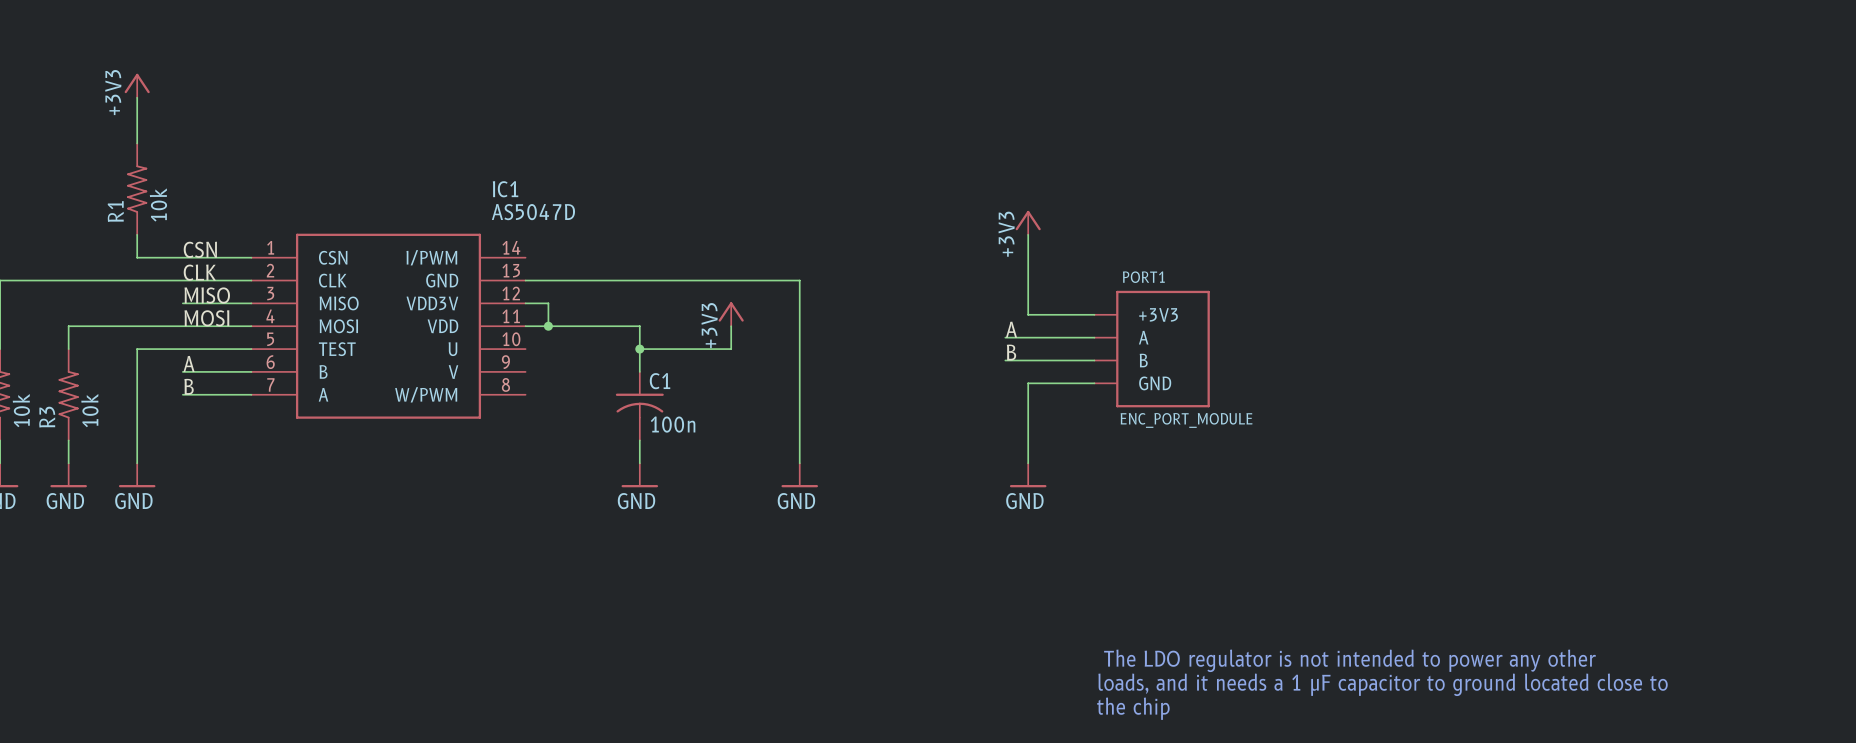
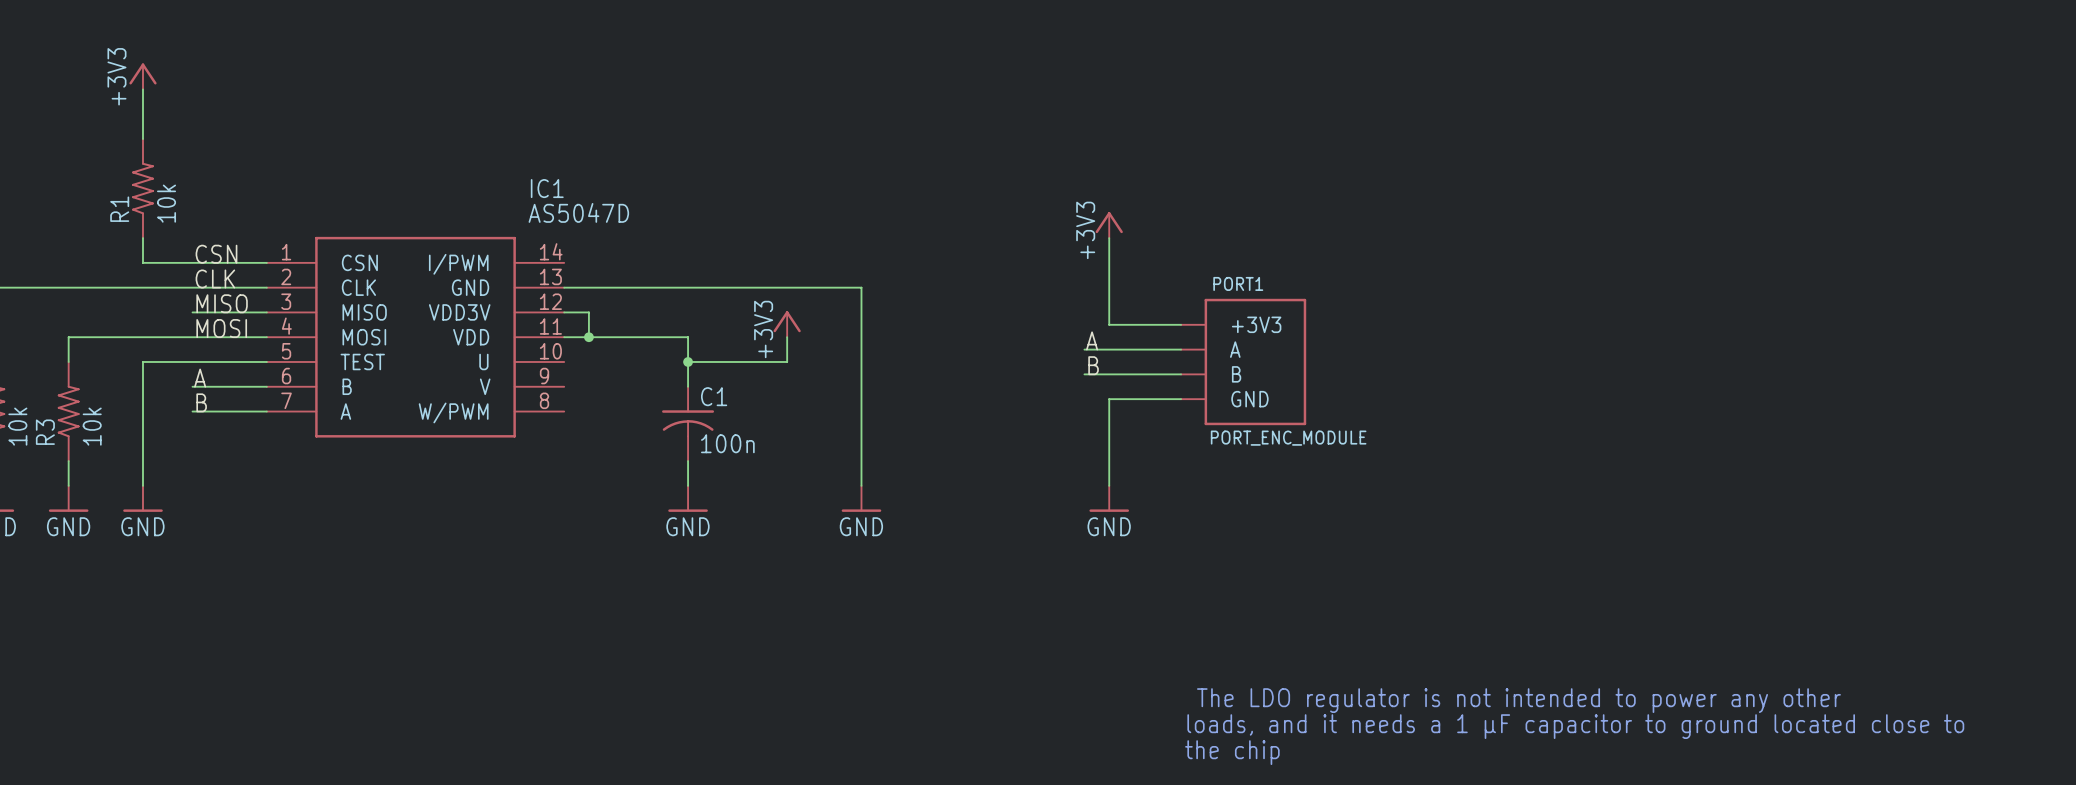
PORT1 value: ENC_PORT_MODULE (1186, 420) -> PORT_ENC_MODULE (1288, 438)

